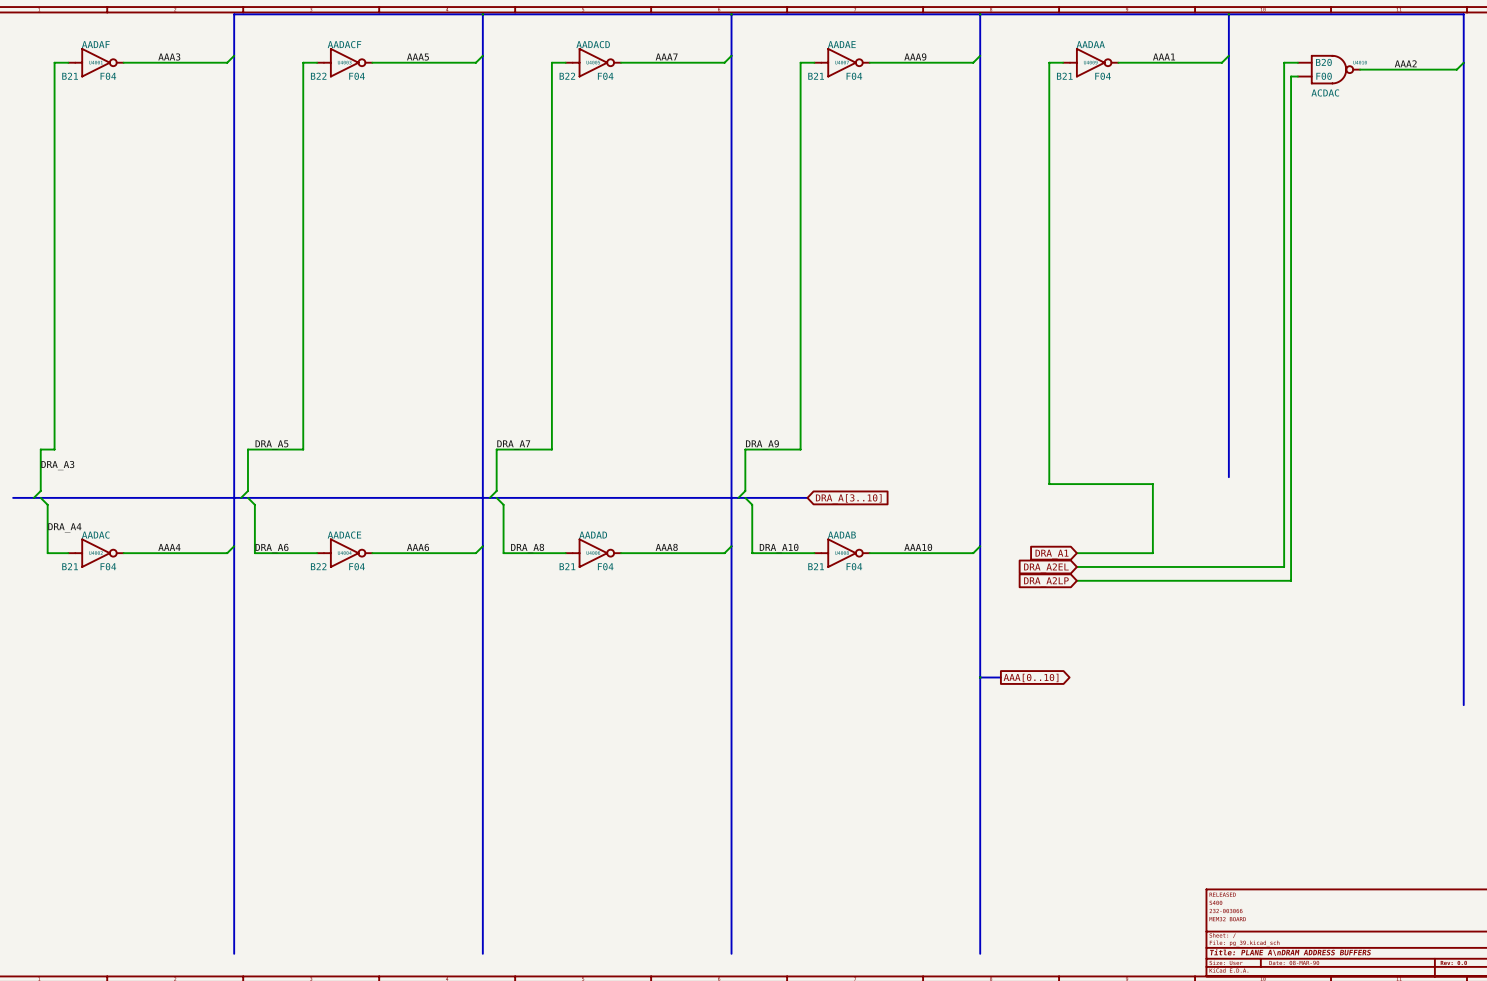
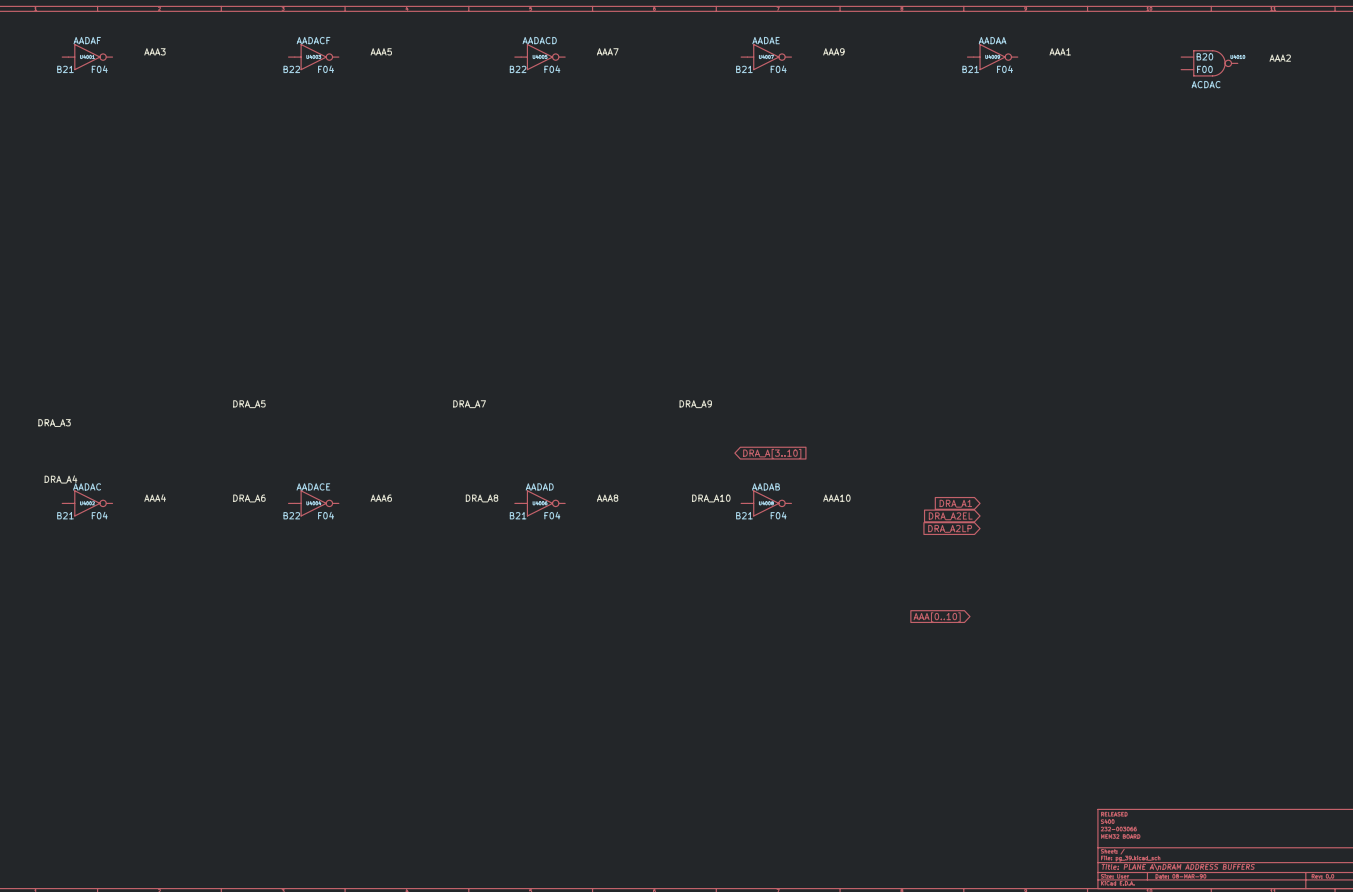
bus: (482, 14) (482, 953) -> none
junction: (482, 14) -> none
bus: (731, 14) (731, 953) -> none
junction: (731, 14) -> none
bus: (980, 14) (980, 953) -> none
junction: (980, 14) -> none
bus: (1228, 14) (1228, 477) -> none
junction: (1228, 14) -> none
wire: (234, 55) (227, 62) (123, 62) -> none
wire: (482, 55) (475, 62) (372, 62) -> none
wire: (731, 55) (724, 62) (621, 62) -> none
wire: (980, 55) (973, 62) (869, 62) -> none
wire: (1228, 55) (1221, 62) (1118, 62) -> none
wire: (68, 62) (54, 62) (54, 449) (40, 449) (40, 491) (33, 497) -> none
wire: (317, 62) (303, 62) (303, 449) (247, 449) (247, 491) (241, 497) -> none
wire: (565, 62) (551, 62) (551, 449) (496, 449) (496, 491) (489, 497) -> none
wire: (814, 62) (800, 62) (800, 449) (745, 449) (745, 491) (738, 497) -> none
wire: (1063, 62) (1049, 62) (1049, 484) (1152, 484) (1152, 553) (1076, 553) -> none
wire: (1297, 62) (1284, 62) (1284, 566) (1076, 566) -> none
wire: (1463, 62) (1456, 69) (1360, 69) -> none
wire: (1297, 76) (1291, 76) (1291, 580) (1076, 580) -> none
bus: (13, 497) (807, 497) -> none
wire: (40, 497) (47, 504) (47, 553) (68, 553) -> none
wire: (247, 497) (254, 504) (254, 553) (317, 553) -> none
wire: (496, 497) (503, 504) (503, 553) (565, 553) -> none
wire: (745, 497) (752, 504) (752, 553) (814, 553) -> none
wire: (234, 546) (227, 553) (123, 553) -> none
wire: (482, 546) (475, 553) (372, 553) -> none
wire: (731, 546) (724, 553) (621, 553) -> none
wire: (980, 546) (973, 553) (869, 553) -> none
bus: (980, 677) (1000, 677) -> none
junction: (980, 677) -> none
bus: (1463, 705) (1463, 14) (234, 14) (234, 953) -> none

